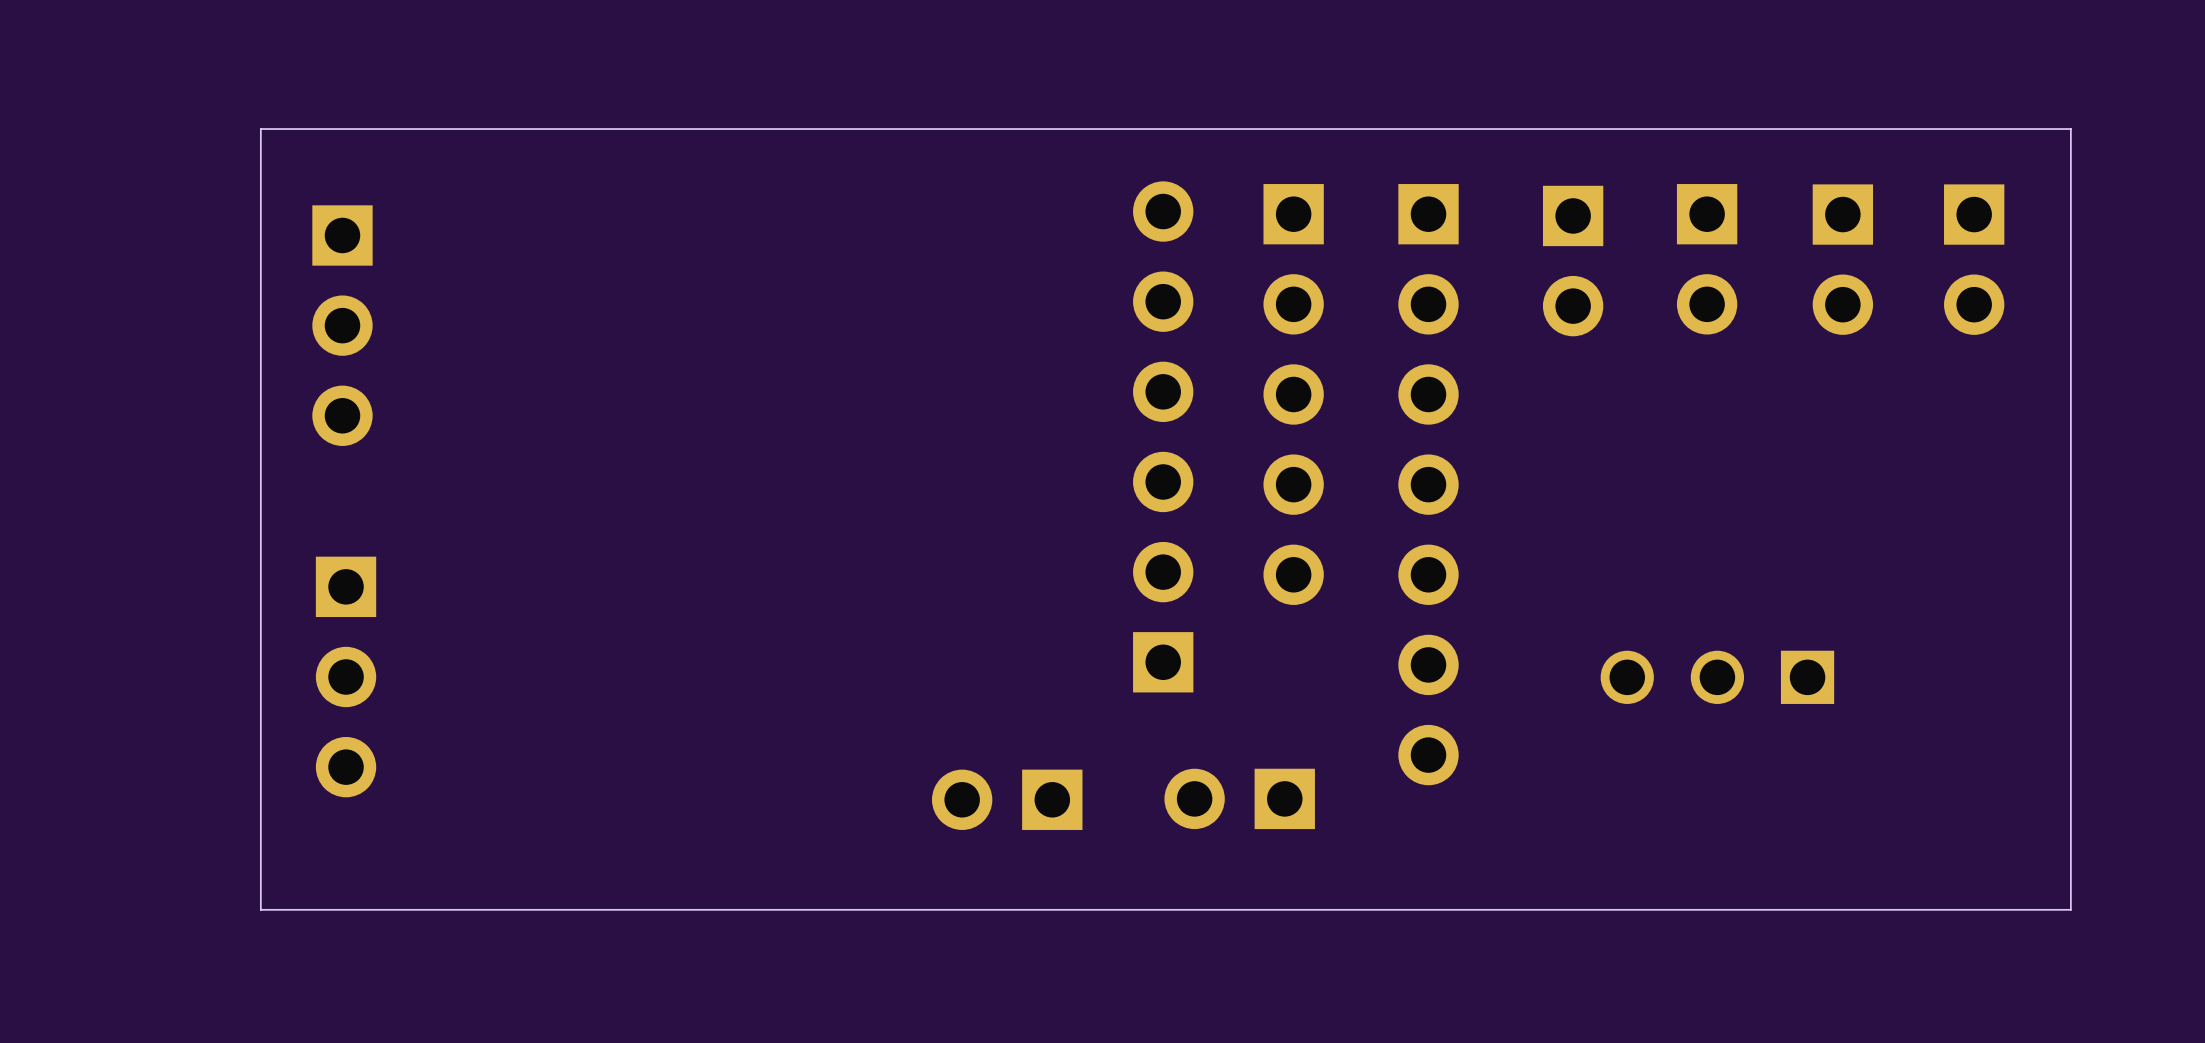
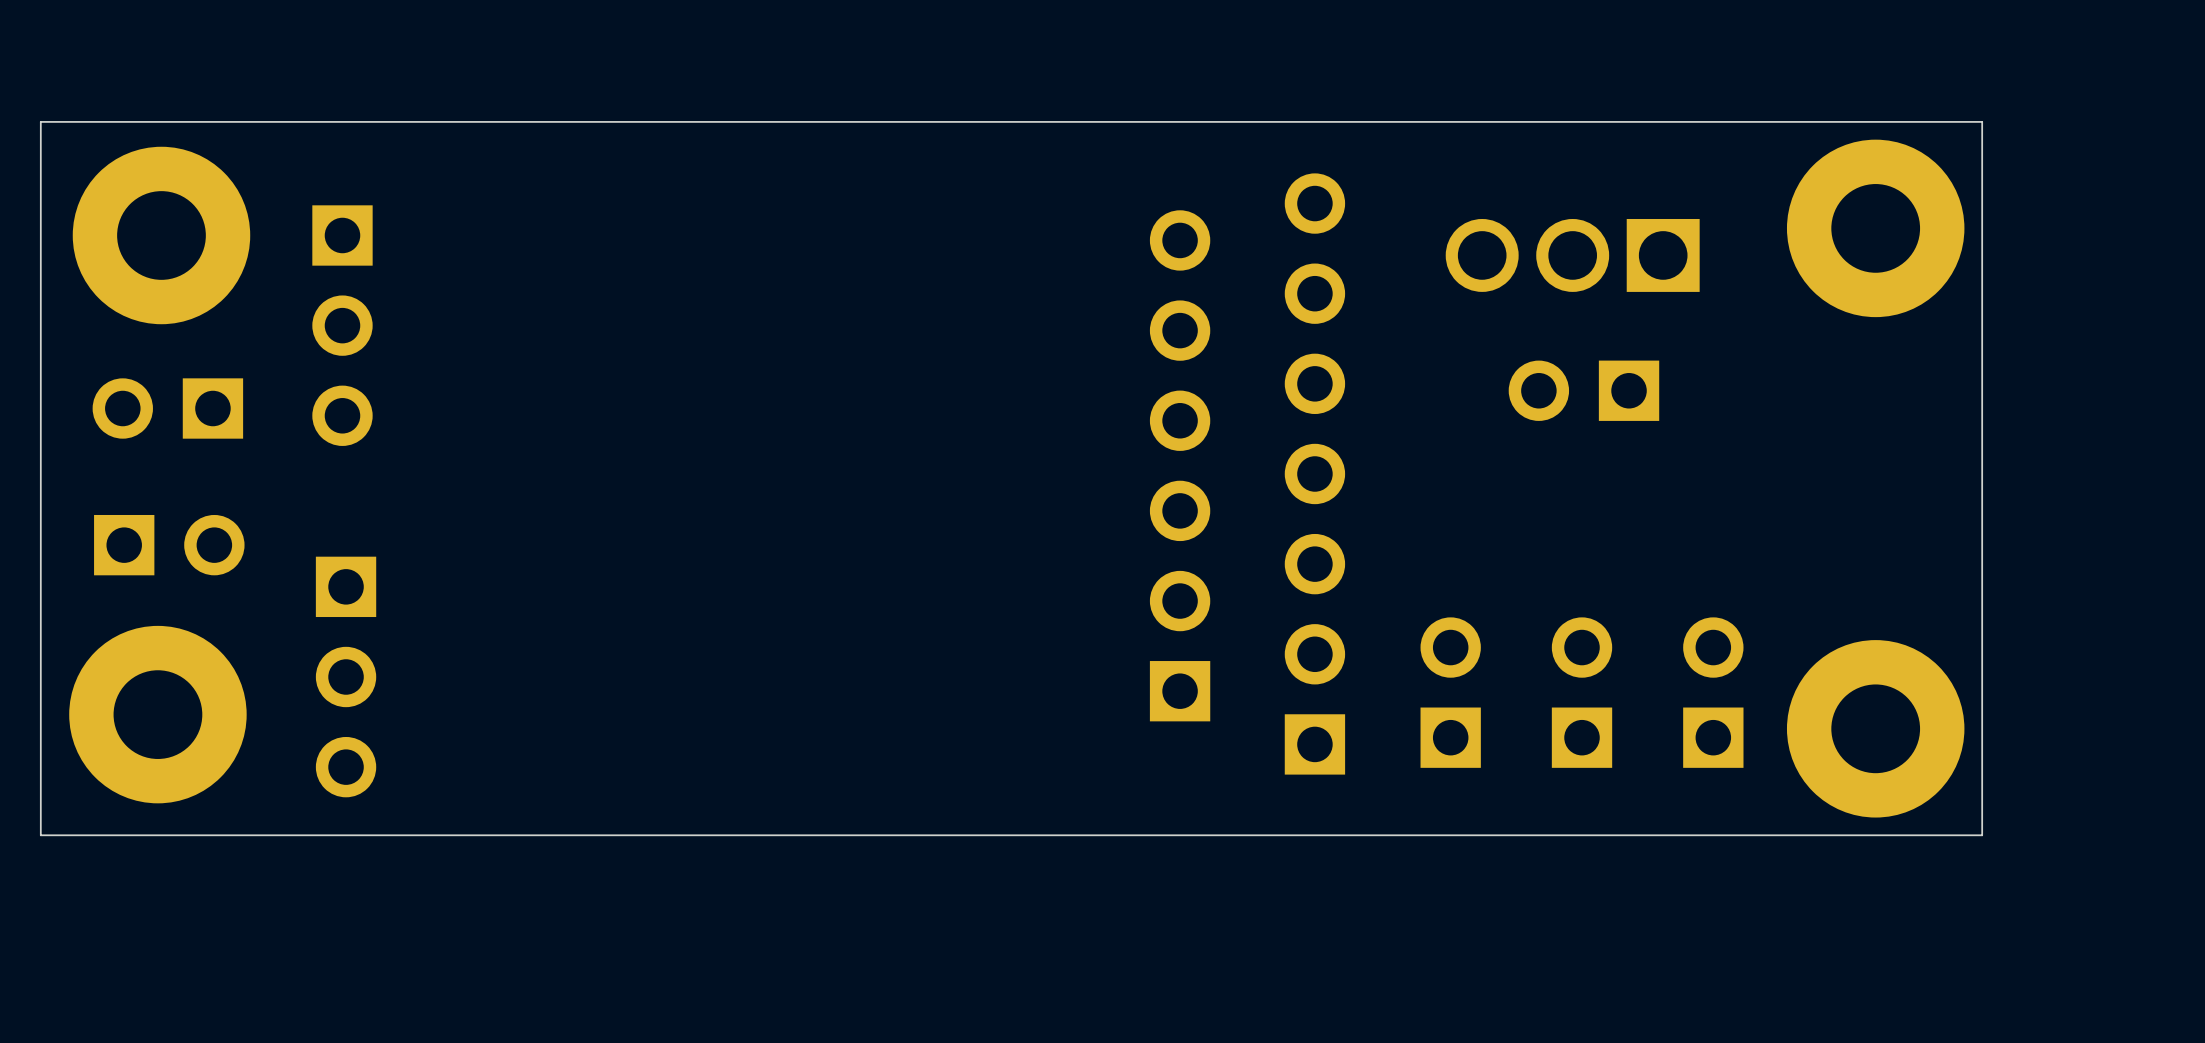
board edge: (2070, 129) (2070, 909) (260, 909) (260, 129) (2070, 129) -> (1982, 121) (1982, 835) (40, 835) (40, 121) (1982, 121)
part footprint: [1542, 185, 1604, 337] -> [1445, 218, 1700, 292]
part: none -> (1875, 228)
part: none -> (161, 235)
part: (1707, 259) -> none
part: (1842, 259) -> none
part: (1974, 259) -> none
part: none -> (1583, 390)
part: (1293, 394) -> none
part: none -> (167, 408)
part position: (1163, 436) -> (1180, 465)
part rotation: 0° (1428, 484) -> 180° (1314, 473)
part: none -> (169, 545)
part footprint: [1600, 650, 1835, 704] -> [1683, 617, 1744, 768]
part: none -> (1450, 692)
part: none -> (1582, 692)
part: none -> (157, 714)
part: none -> (1875, 728)
part: (1239, 798) -> none
part: (1007, 799) -> none

